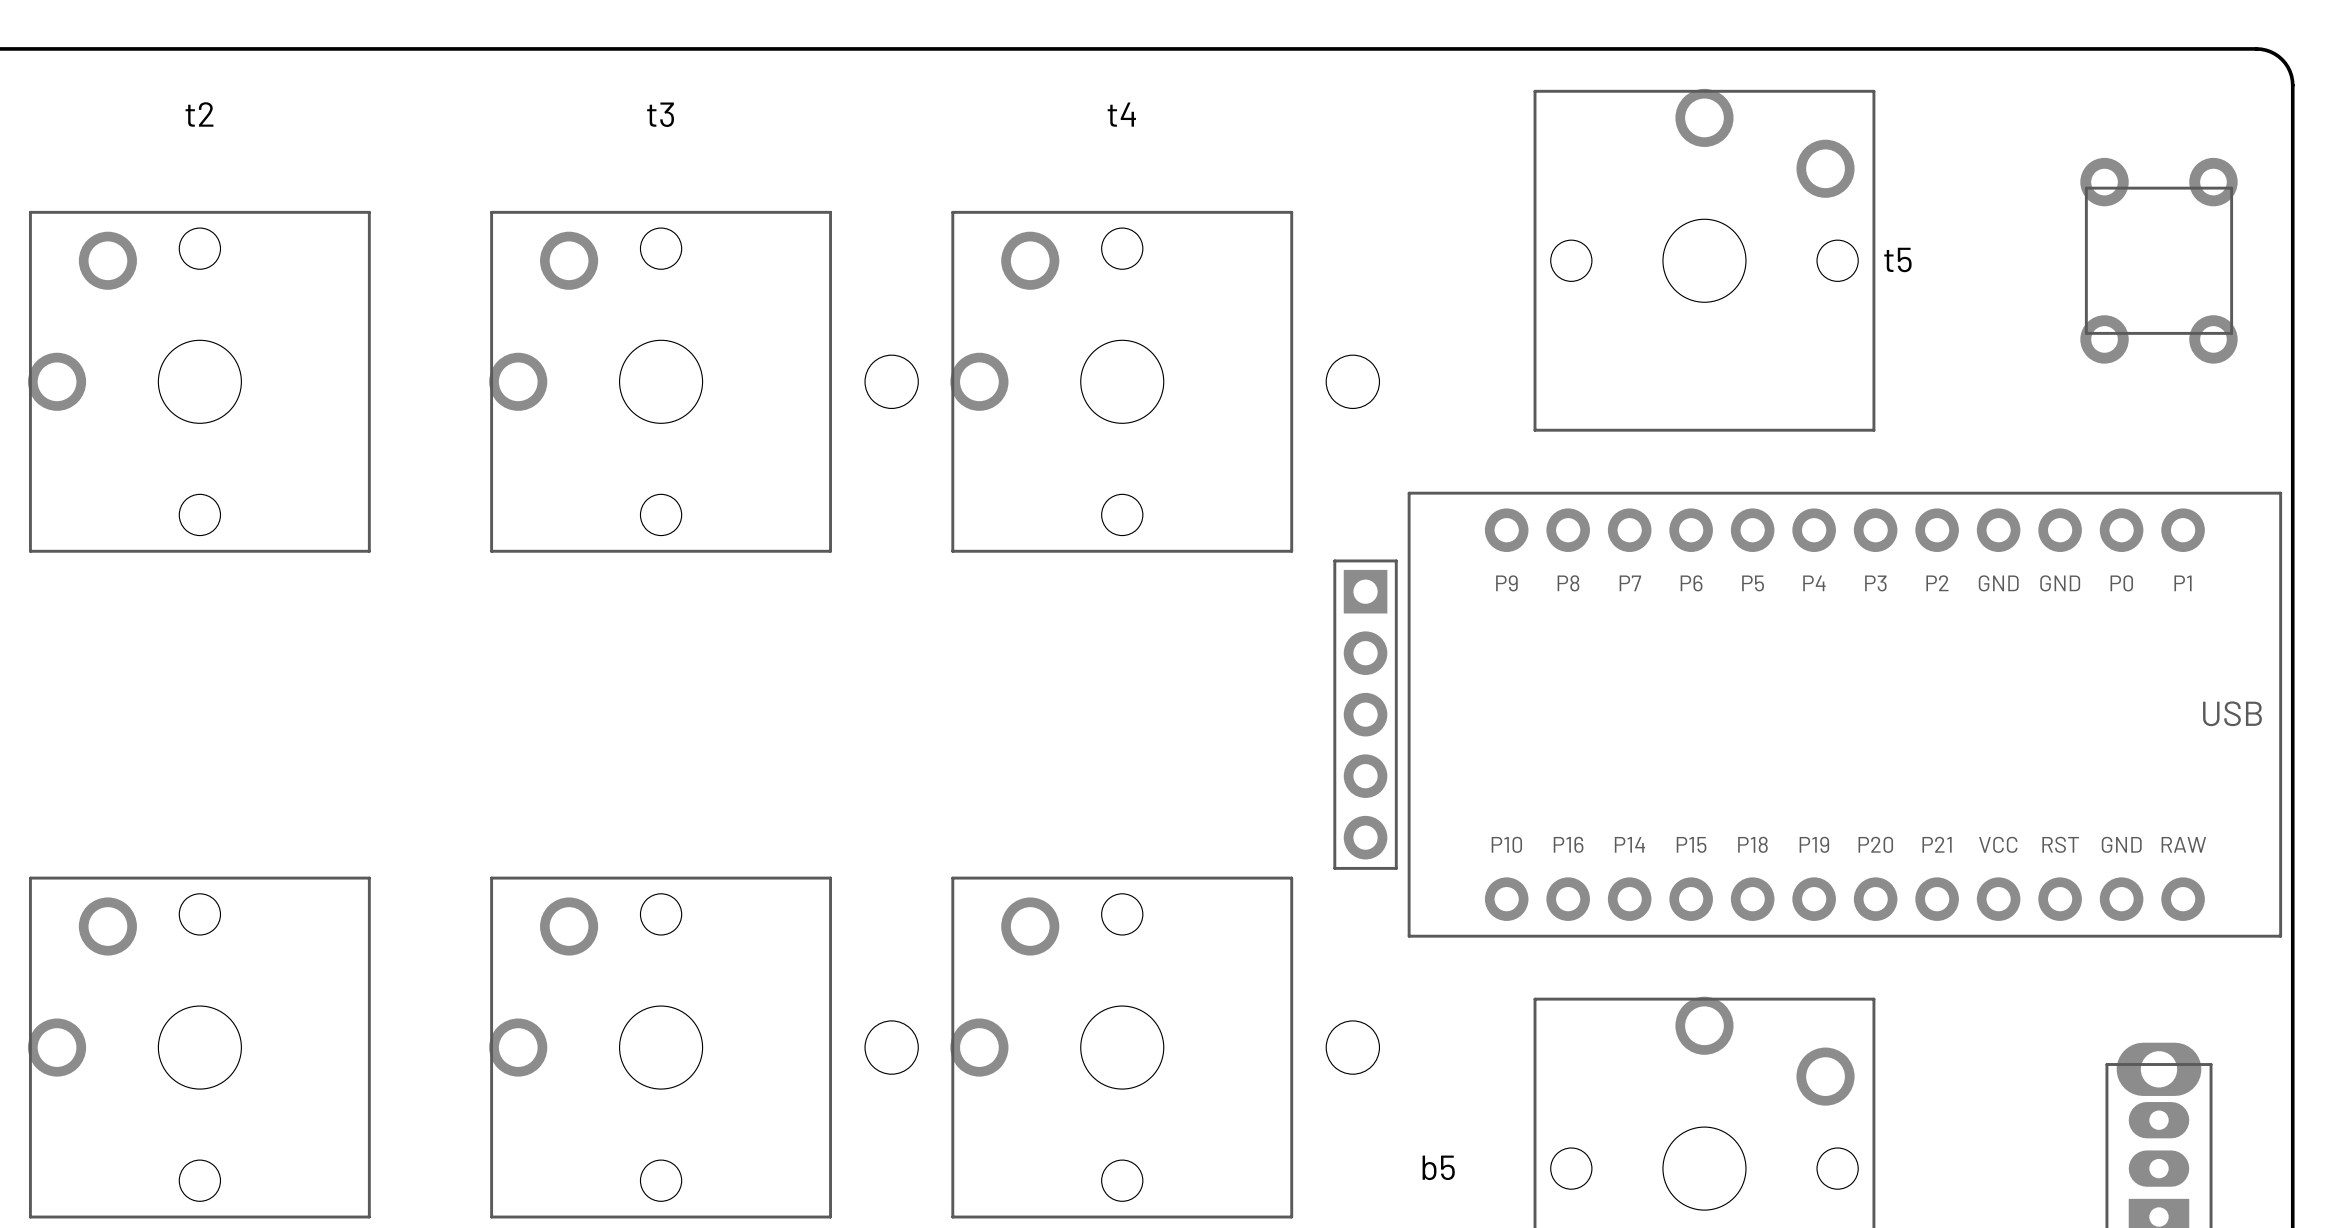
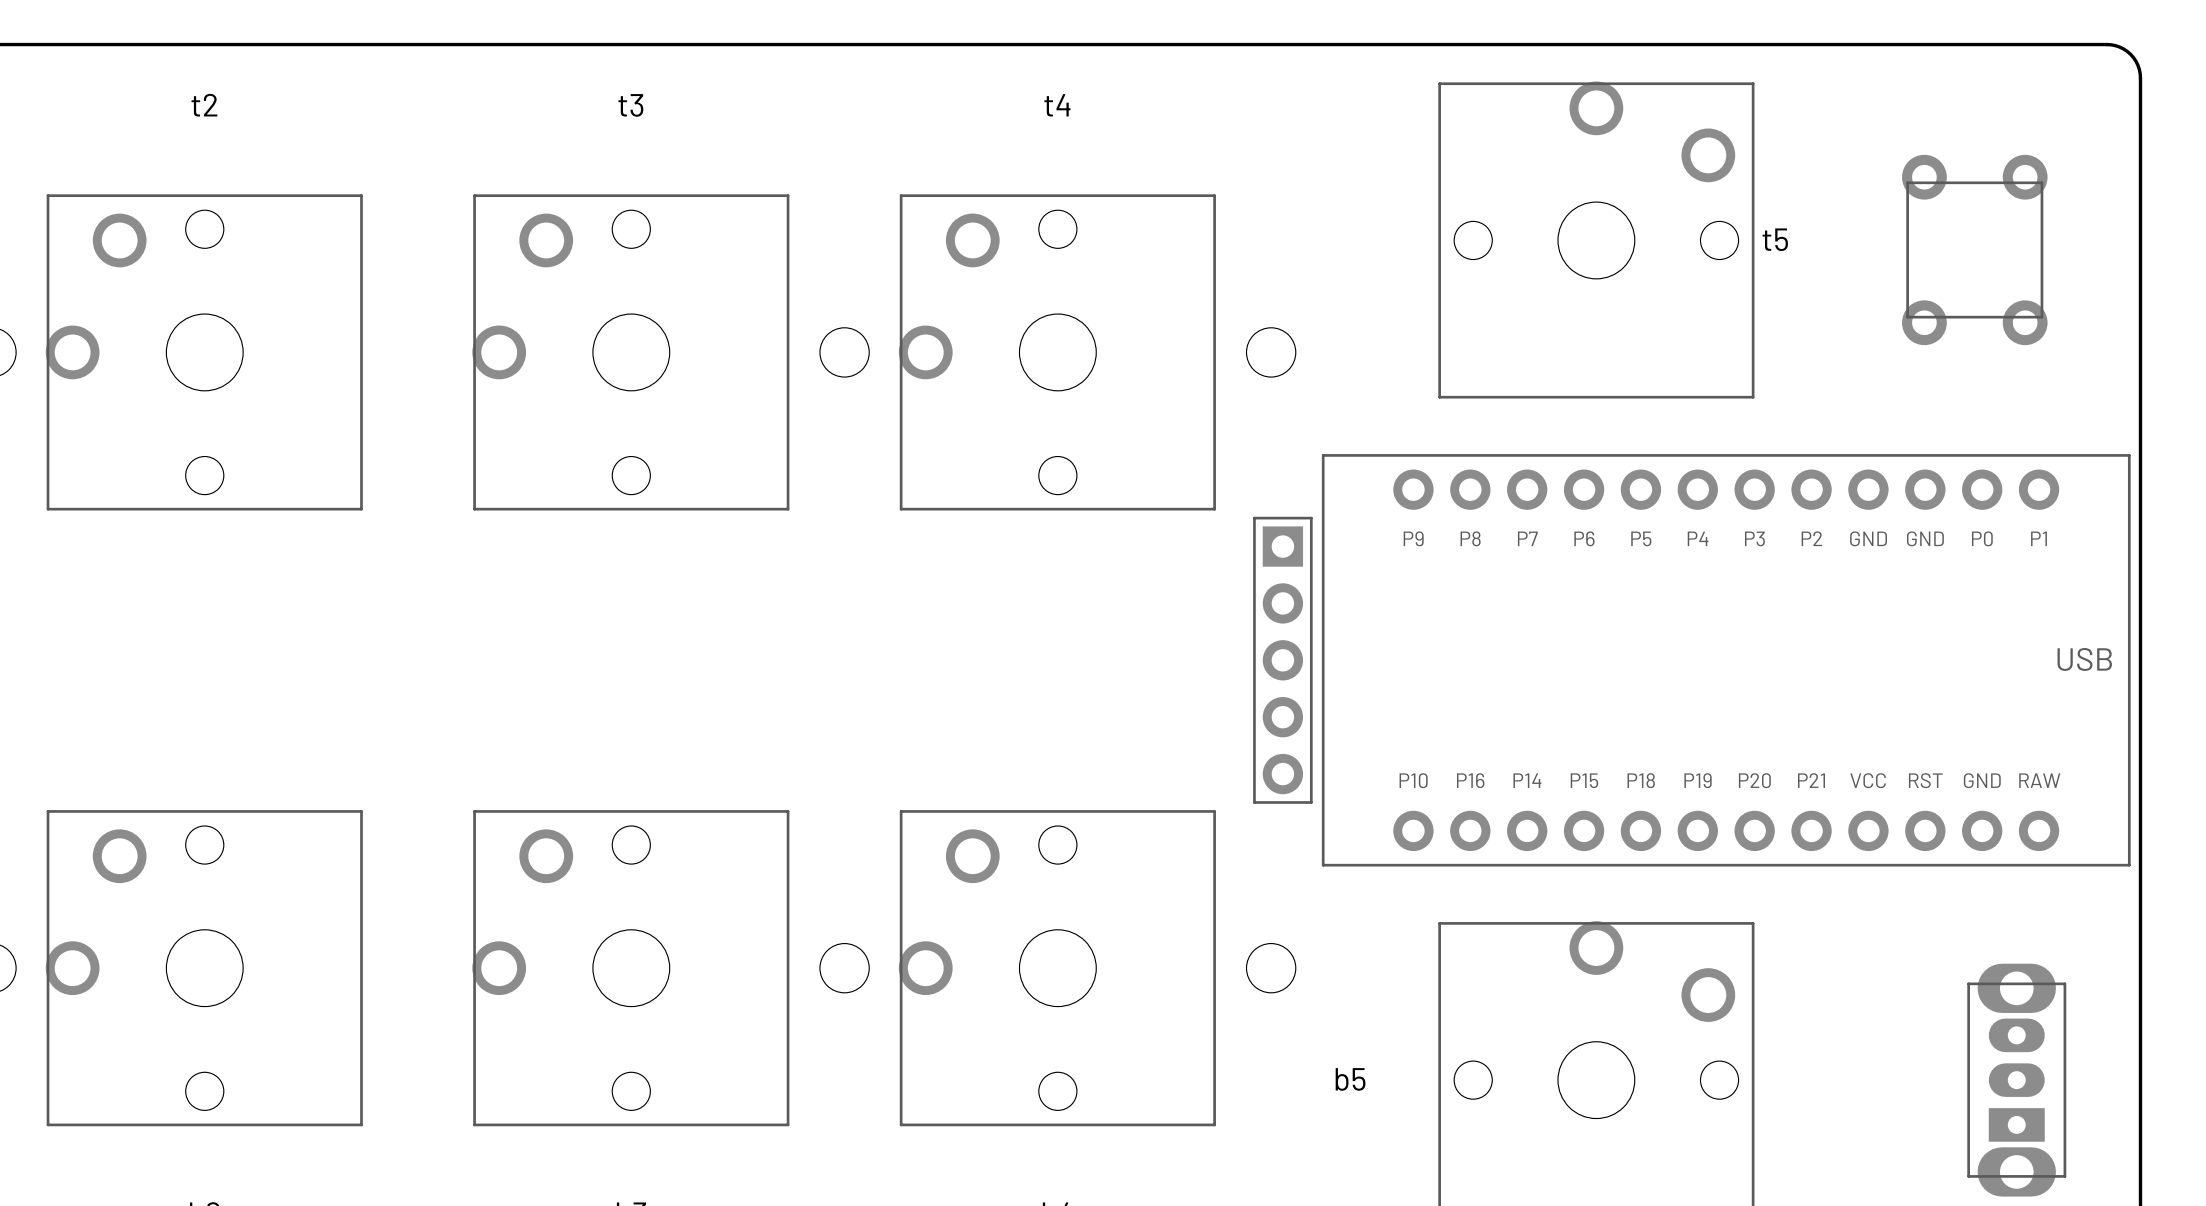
part position: (2158, 260) -> (1974, 249)

